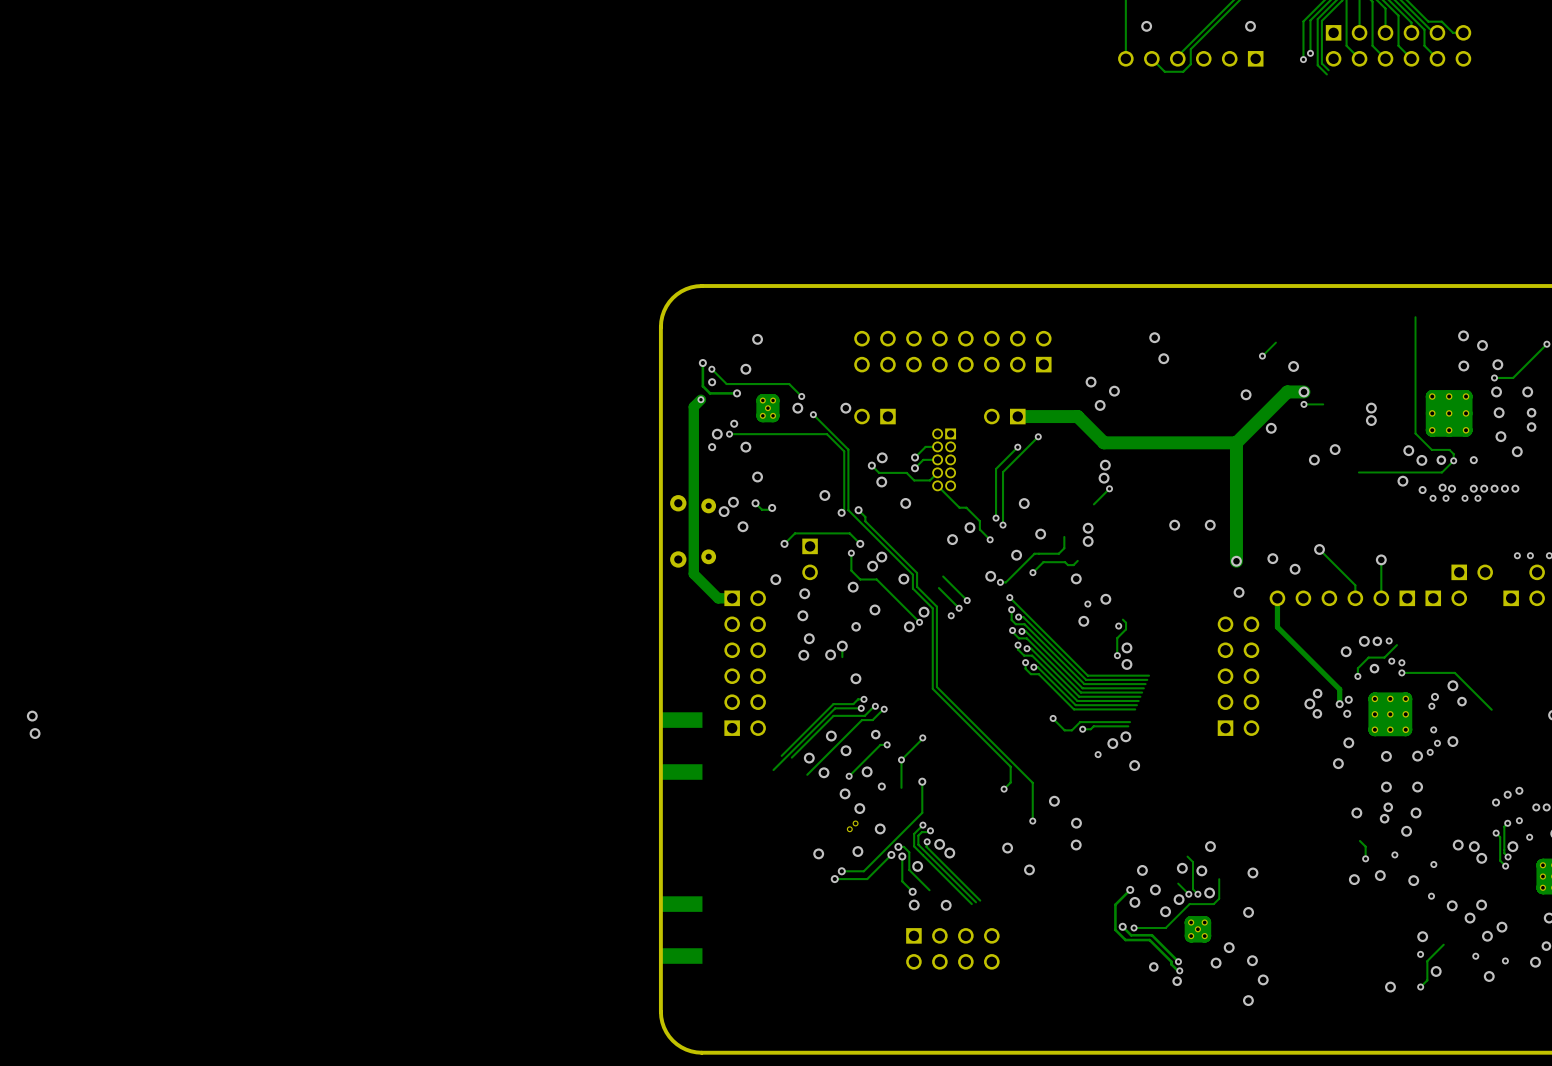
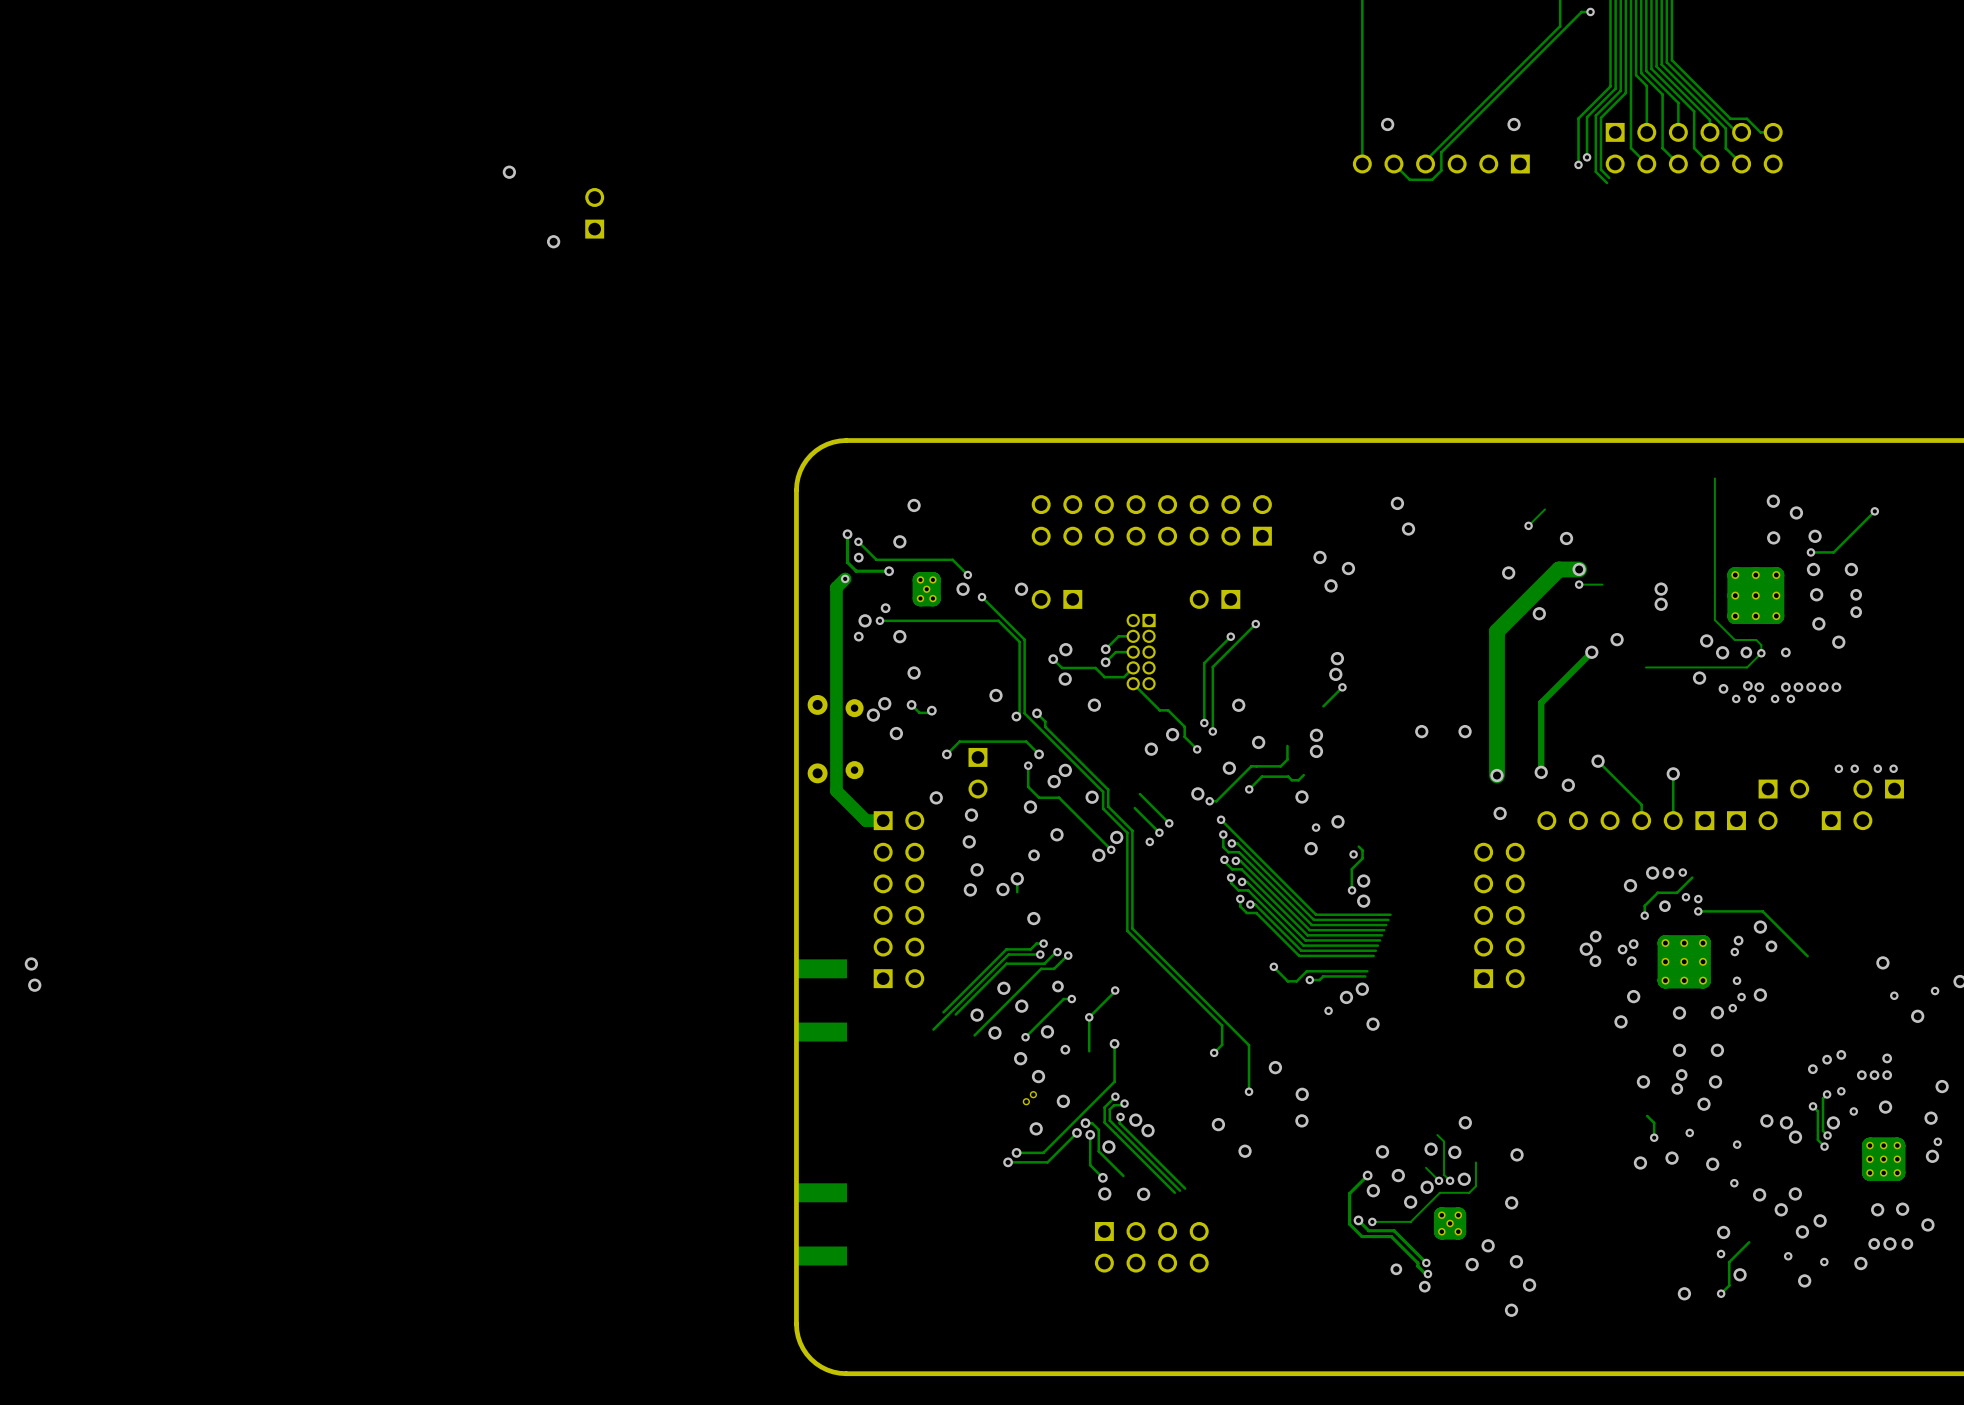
via: none -> (509, 172)
part: none -> (594, 213)
via: none -> (553, 241)
track: (1017, 416) (1077, 416) (1103, 442) (1236, 442) -> none
track: none -> (1591, 652) (1541, 702) (1541, 772)
track: (1277, 598) (1277, 627) (1339, 689) (1339, 704) -> none
via: (818, 853) -> none

